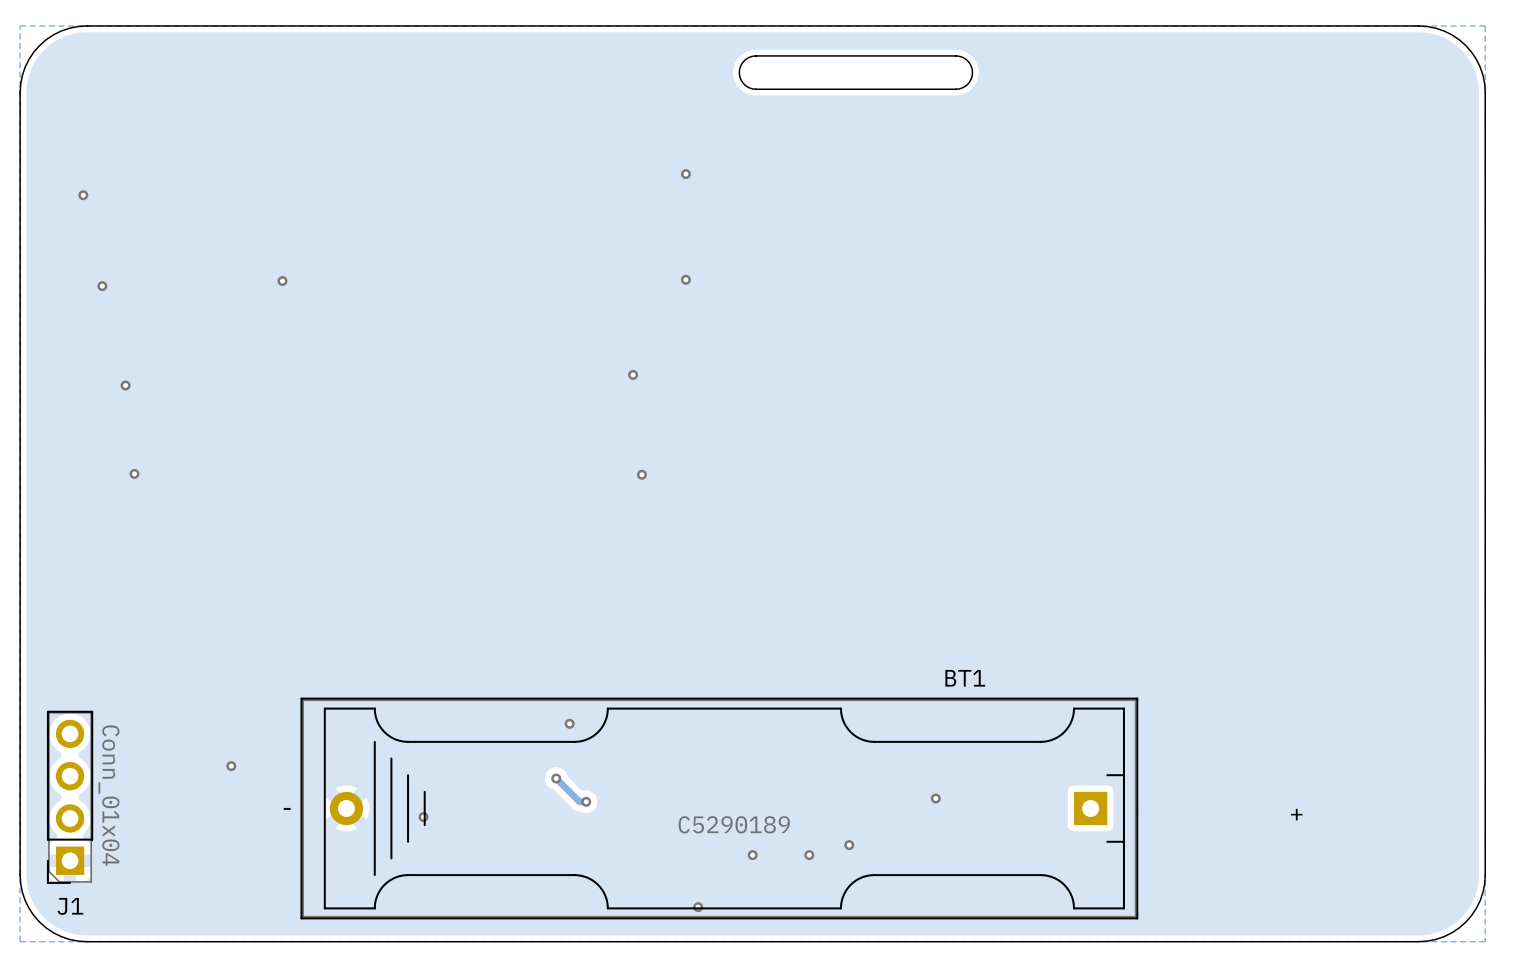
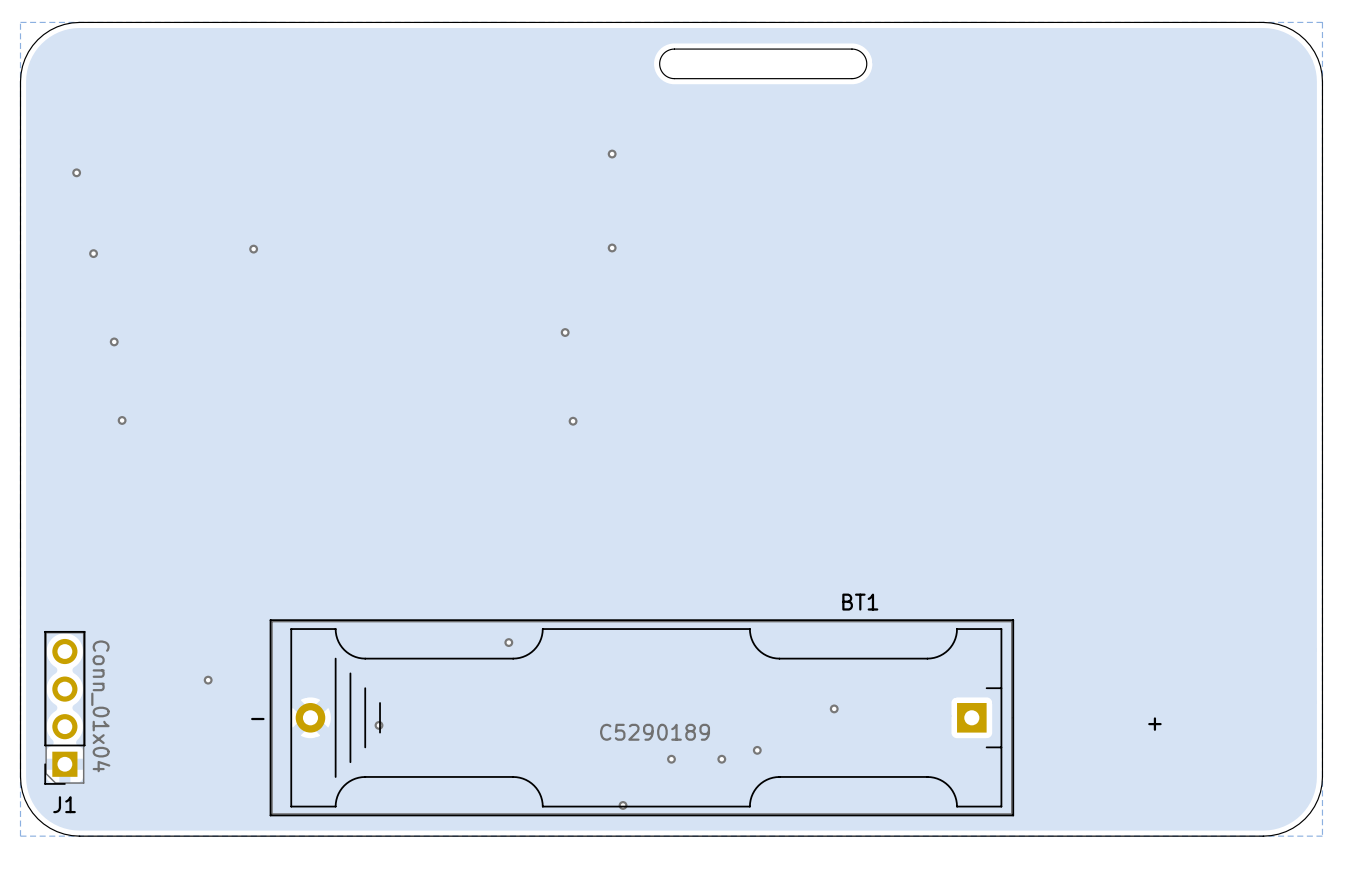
track: (556, 778) (579, 801) (586, 801) -> none
via: (556, 778) -> none
via: (586, 801) -> none

